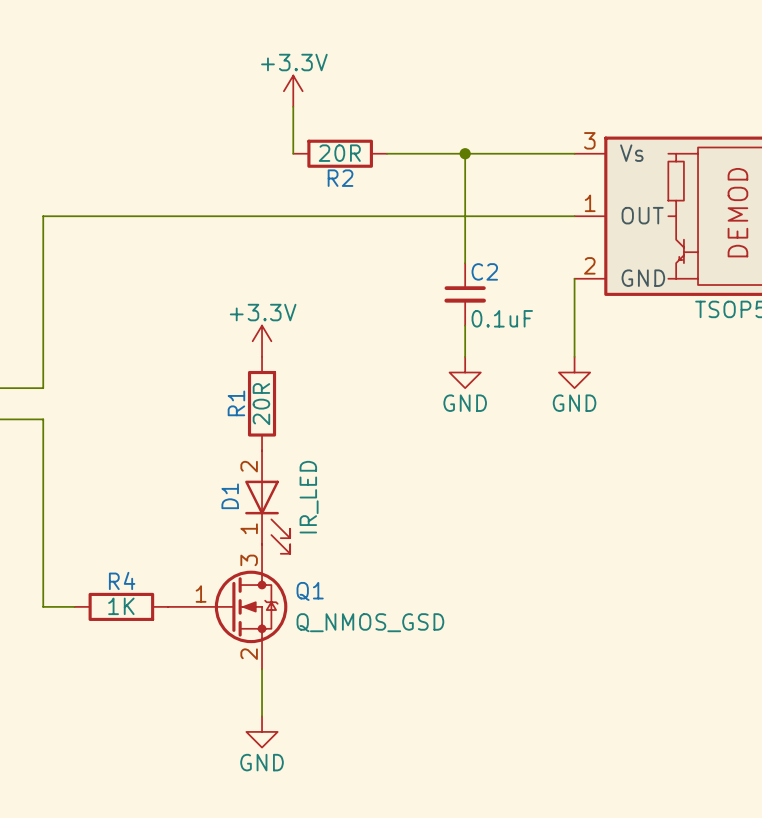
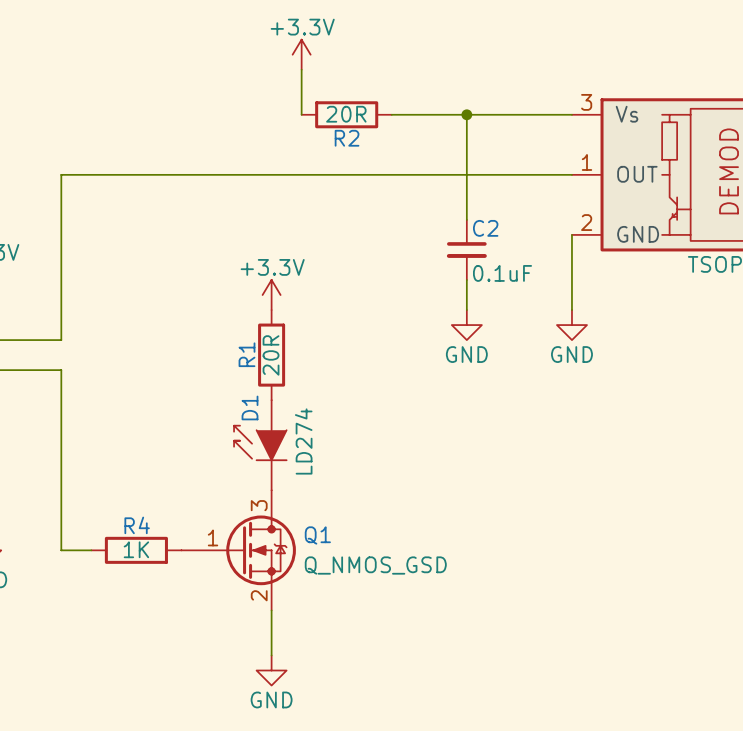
D1 symbol: [245, 450, 291, 554] -> [234, 400, 288, 491]
D1 name position: D1 (230, 496) -> D1 (250, 407)
D1 value: IR_LED (309, 497) -> LD274 (303, 441)

